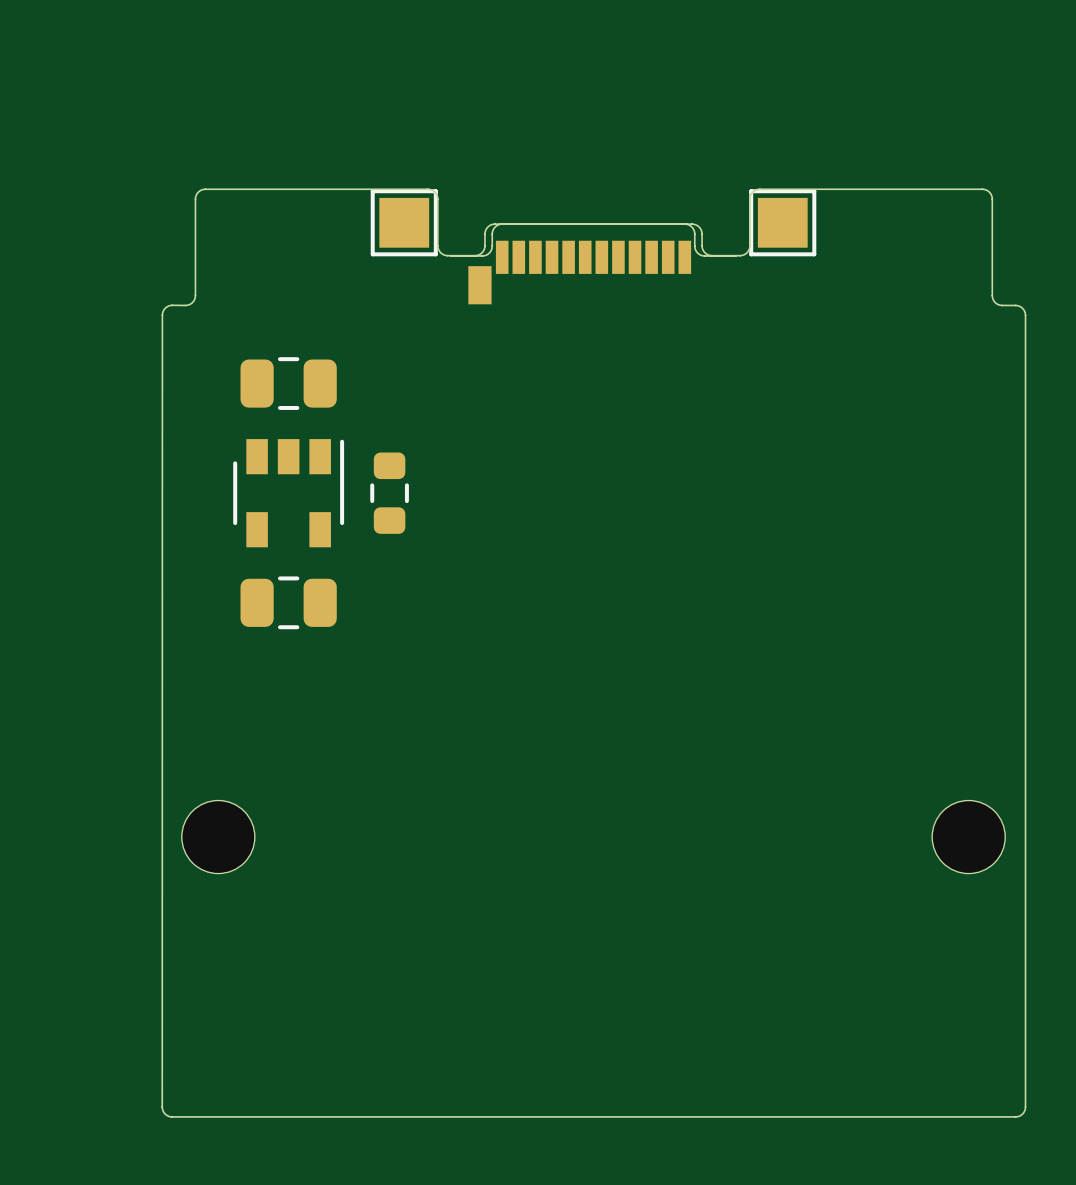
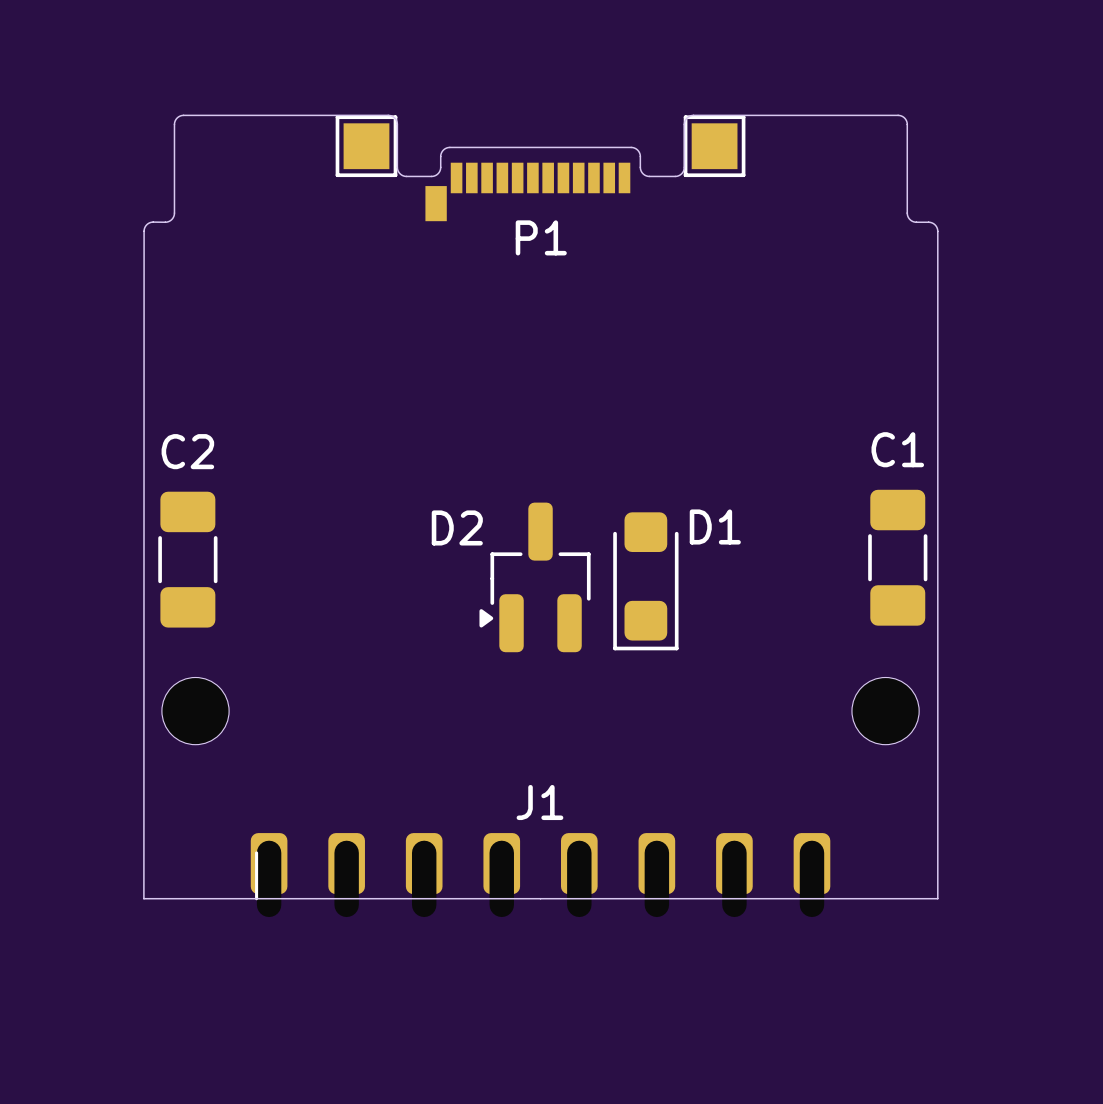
part: (593, 263) -> none
P1: none -> (527, 191)
board edge: (162, 315) (162, 1106) (166, 1114) (172, 1116) (1016, 1116) (1022, 1114) (1025, 1108) (1025, 1041) -> (144, 231) (143, 898)
part: (288, 383) -> none
part: (288, 493) -> none
part: (389, 493) -> none
part: (288, 602) -> none
C1: none -> (897, 557)
C2: none -> (187, 559)
D2: none -> (535, 577)
D1: none -> (645, 581)
J1: none -> (540, 875)

